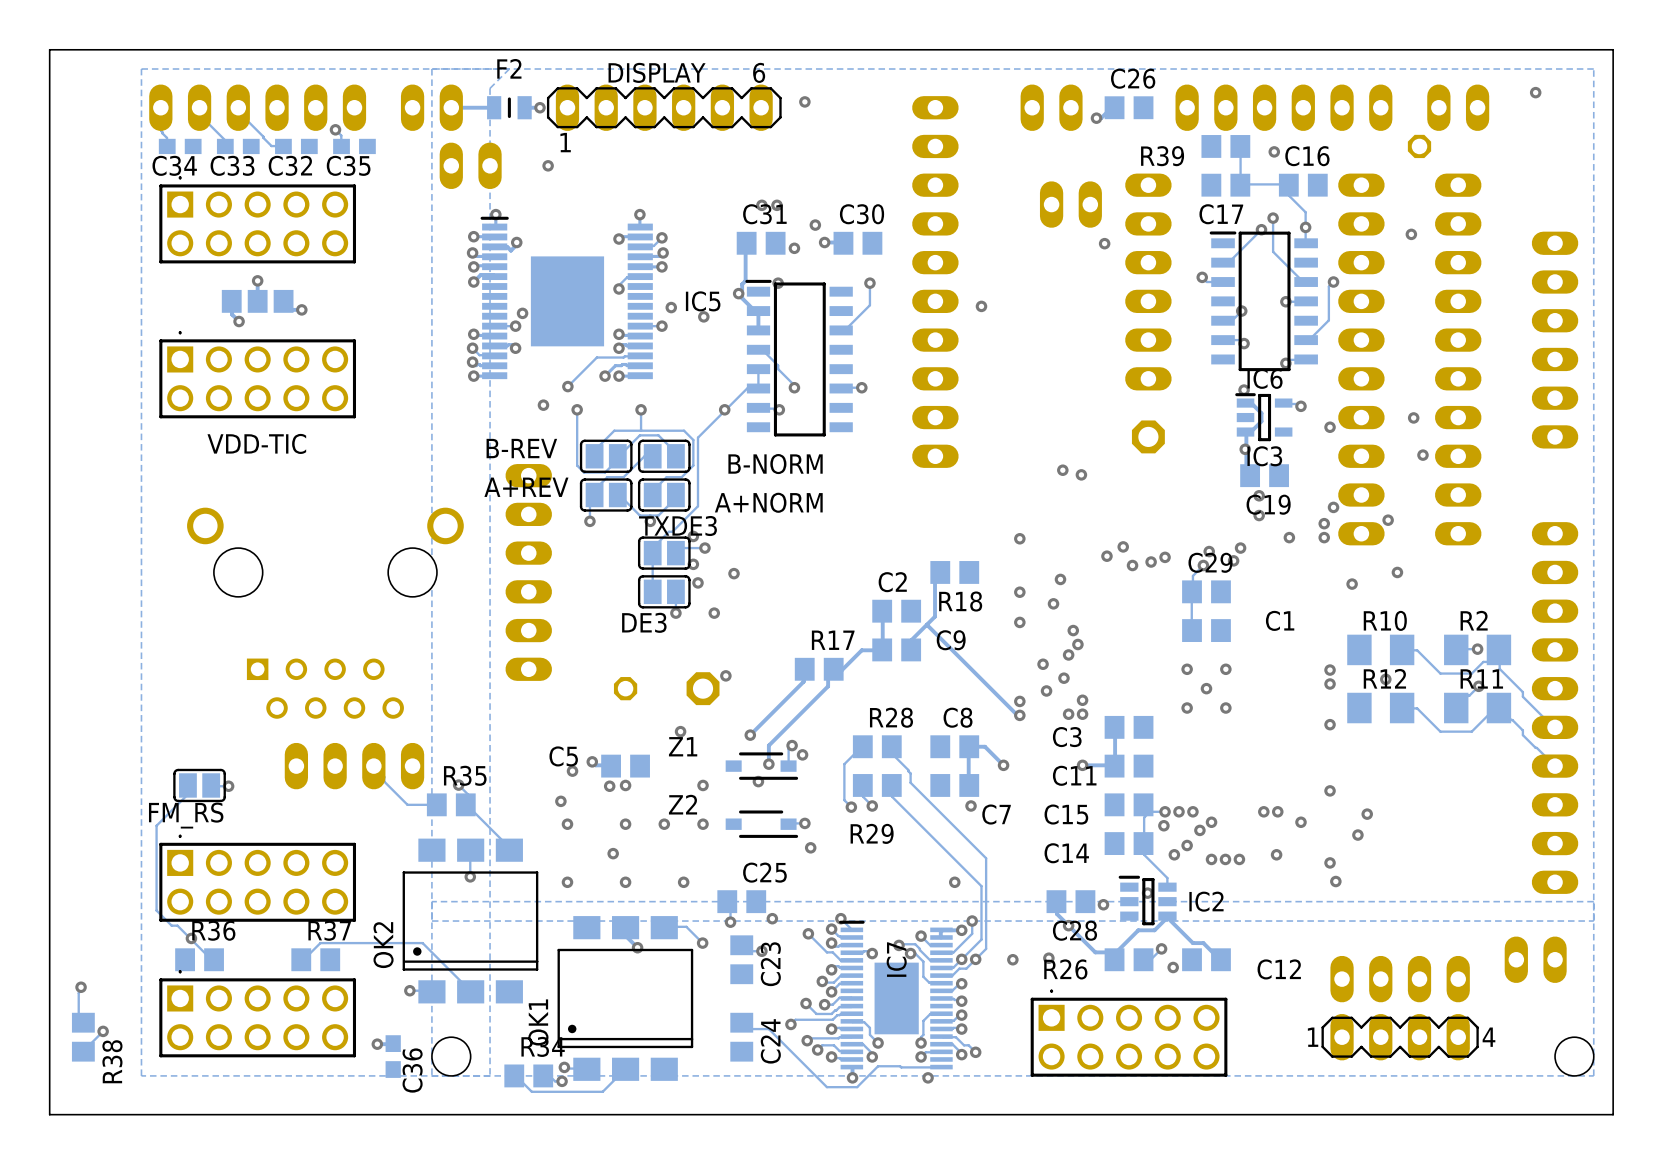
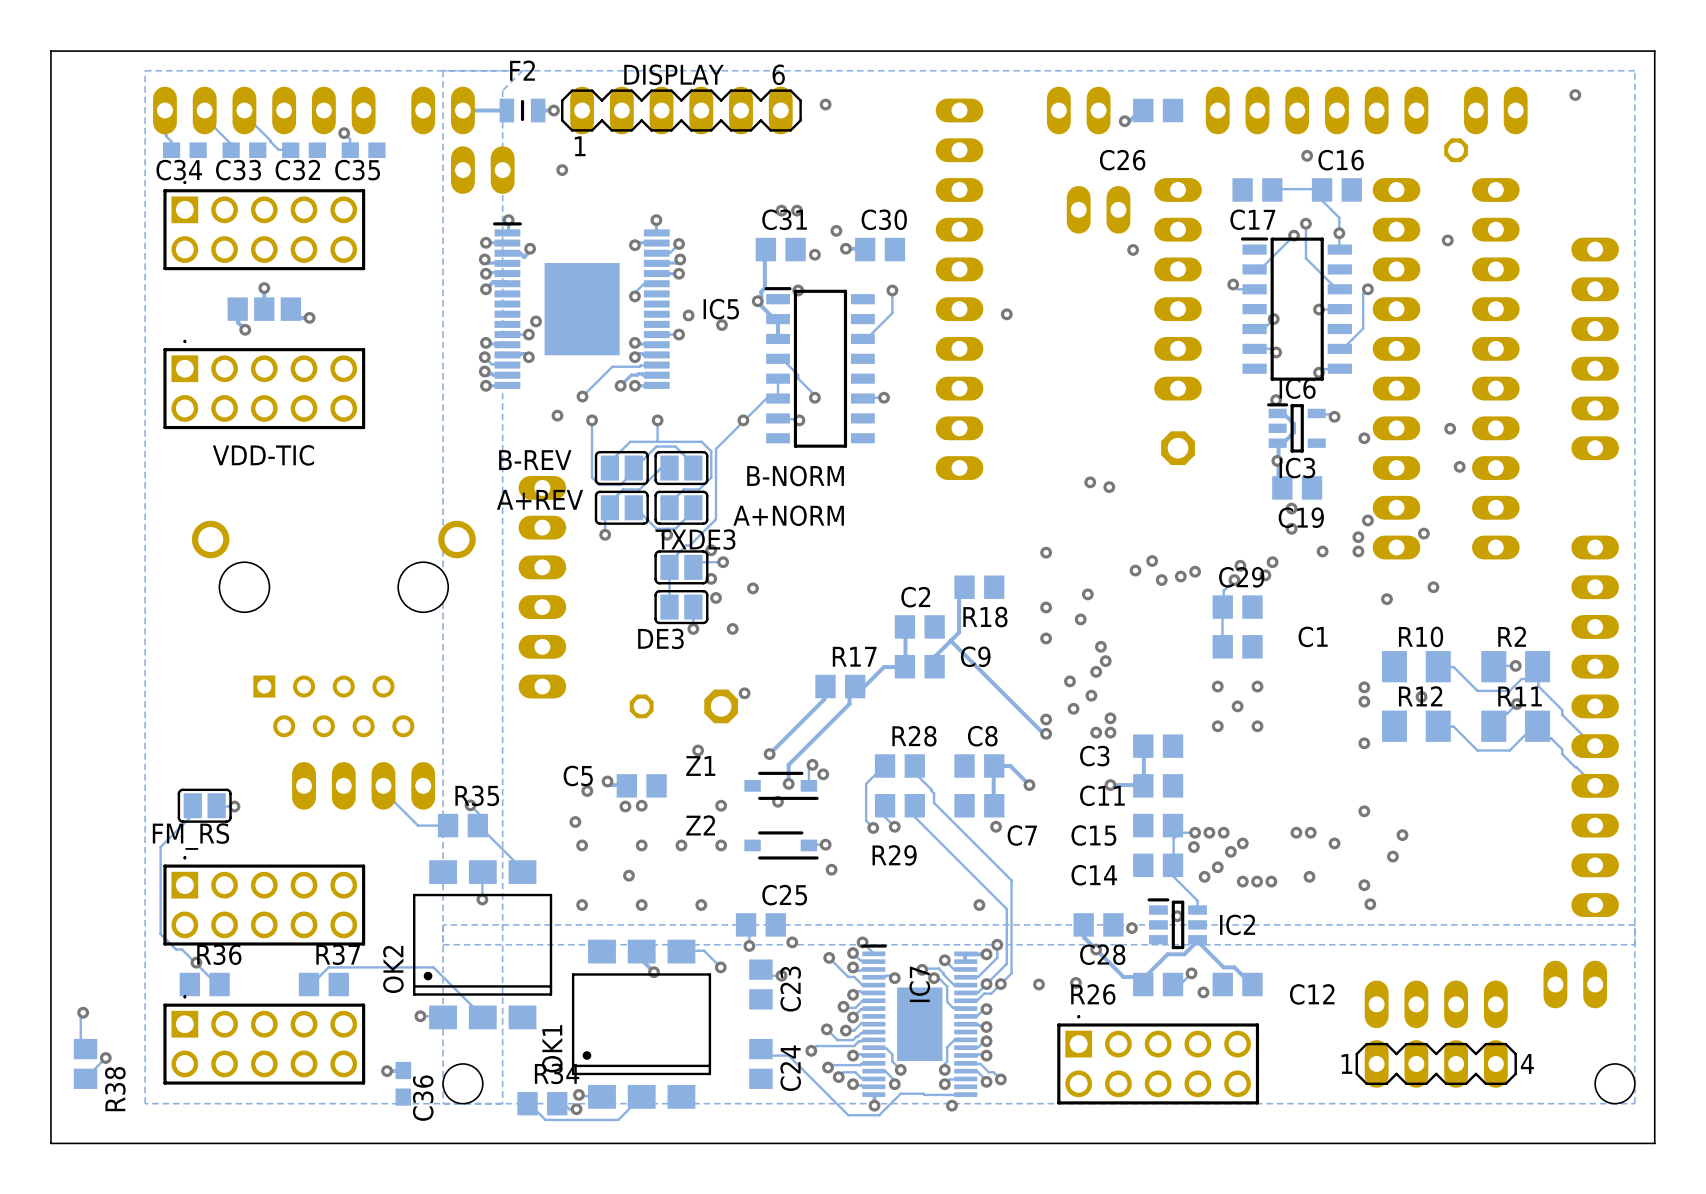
C26 name position: C26 (1133, 78) -> C26 (1122, 160)
R39: (1225, 146) -> none
track: (1240, 146) (1240, 185) -> none

